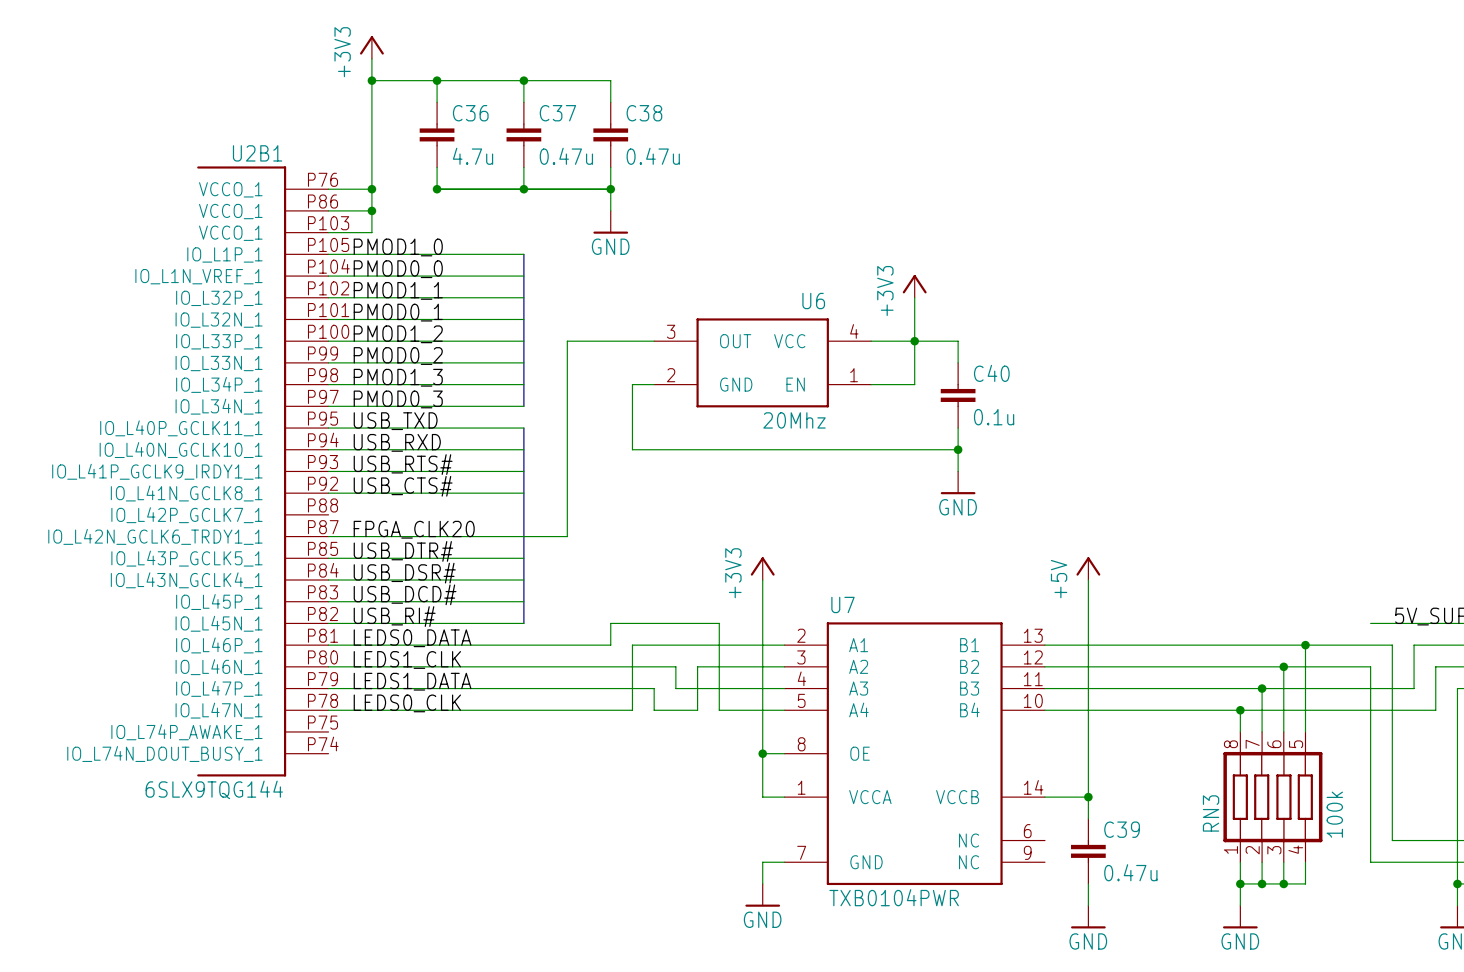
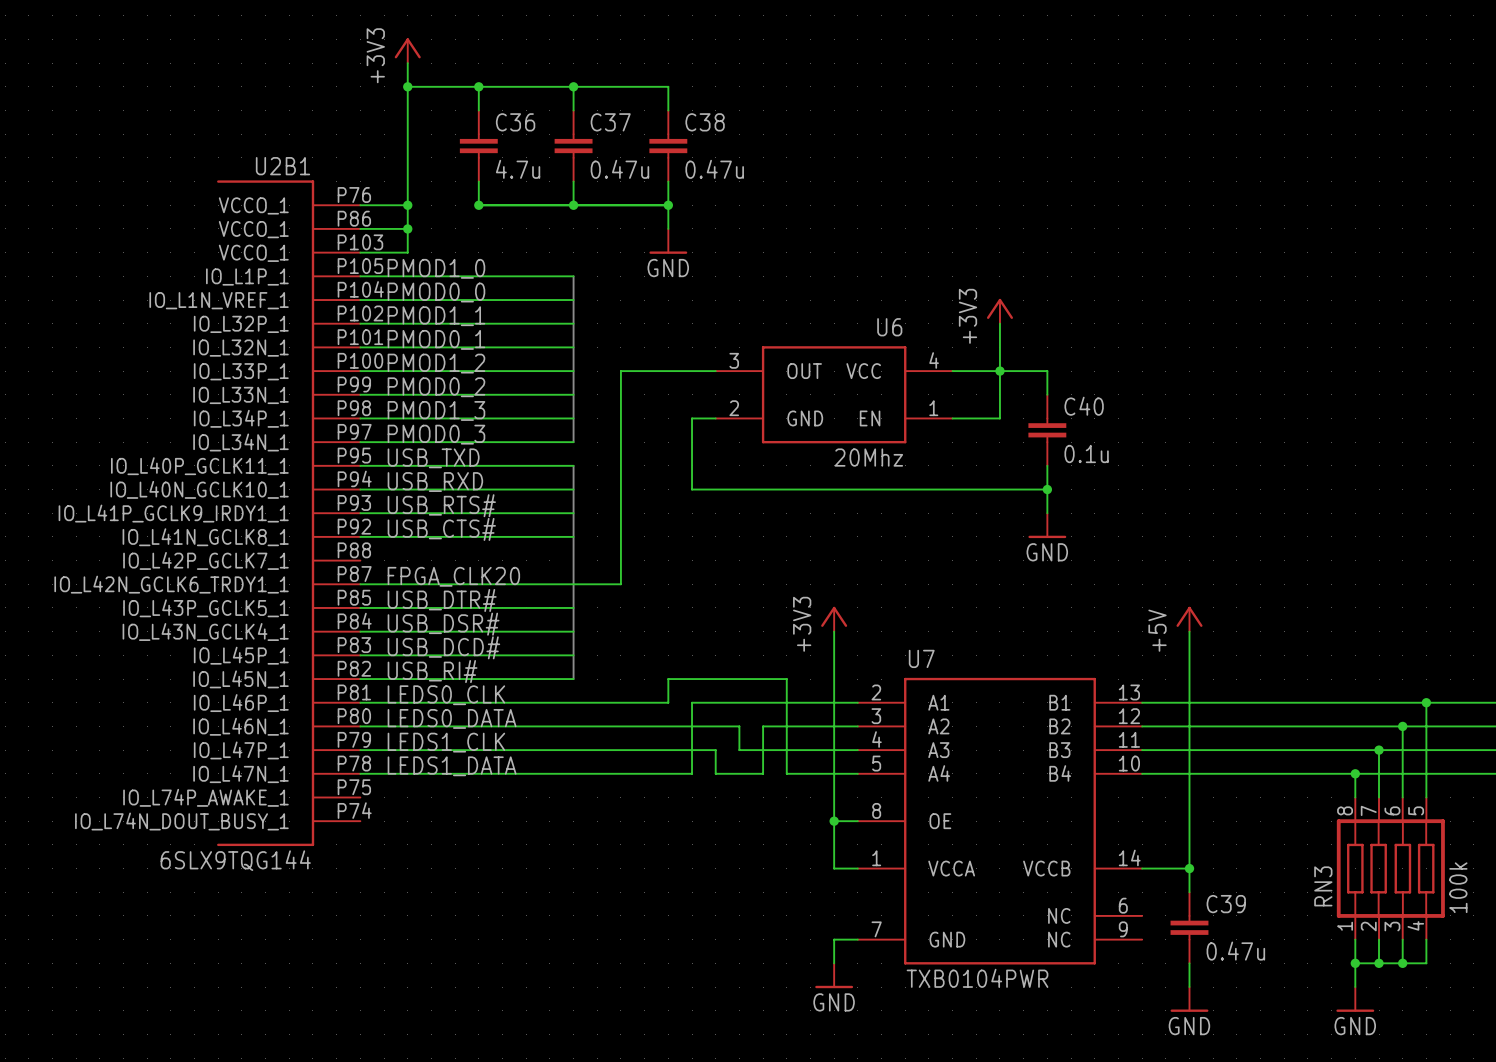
label: LEDS0_DATA (412, 638) -> LEDS0_CLK (446, 695)
label: LEDS1_CLK (407, 659) -> LEDS0_DATA (452, 718)
label: LEDS1_DATA (412, 681) -> LEDS1_CLK (446, 742)
label: LEDS0_CLK (407, 703) -> LEDS1_DATA (452, 766)

